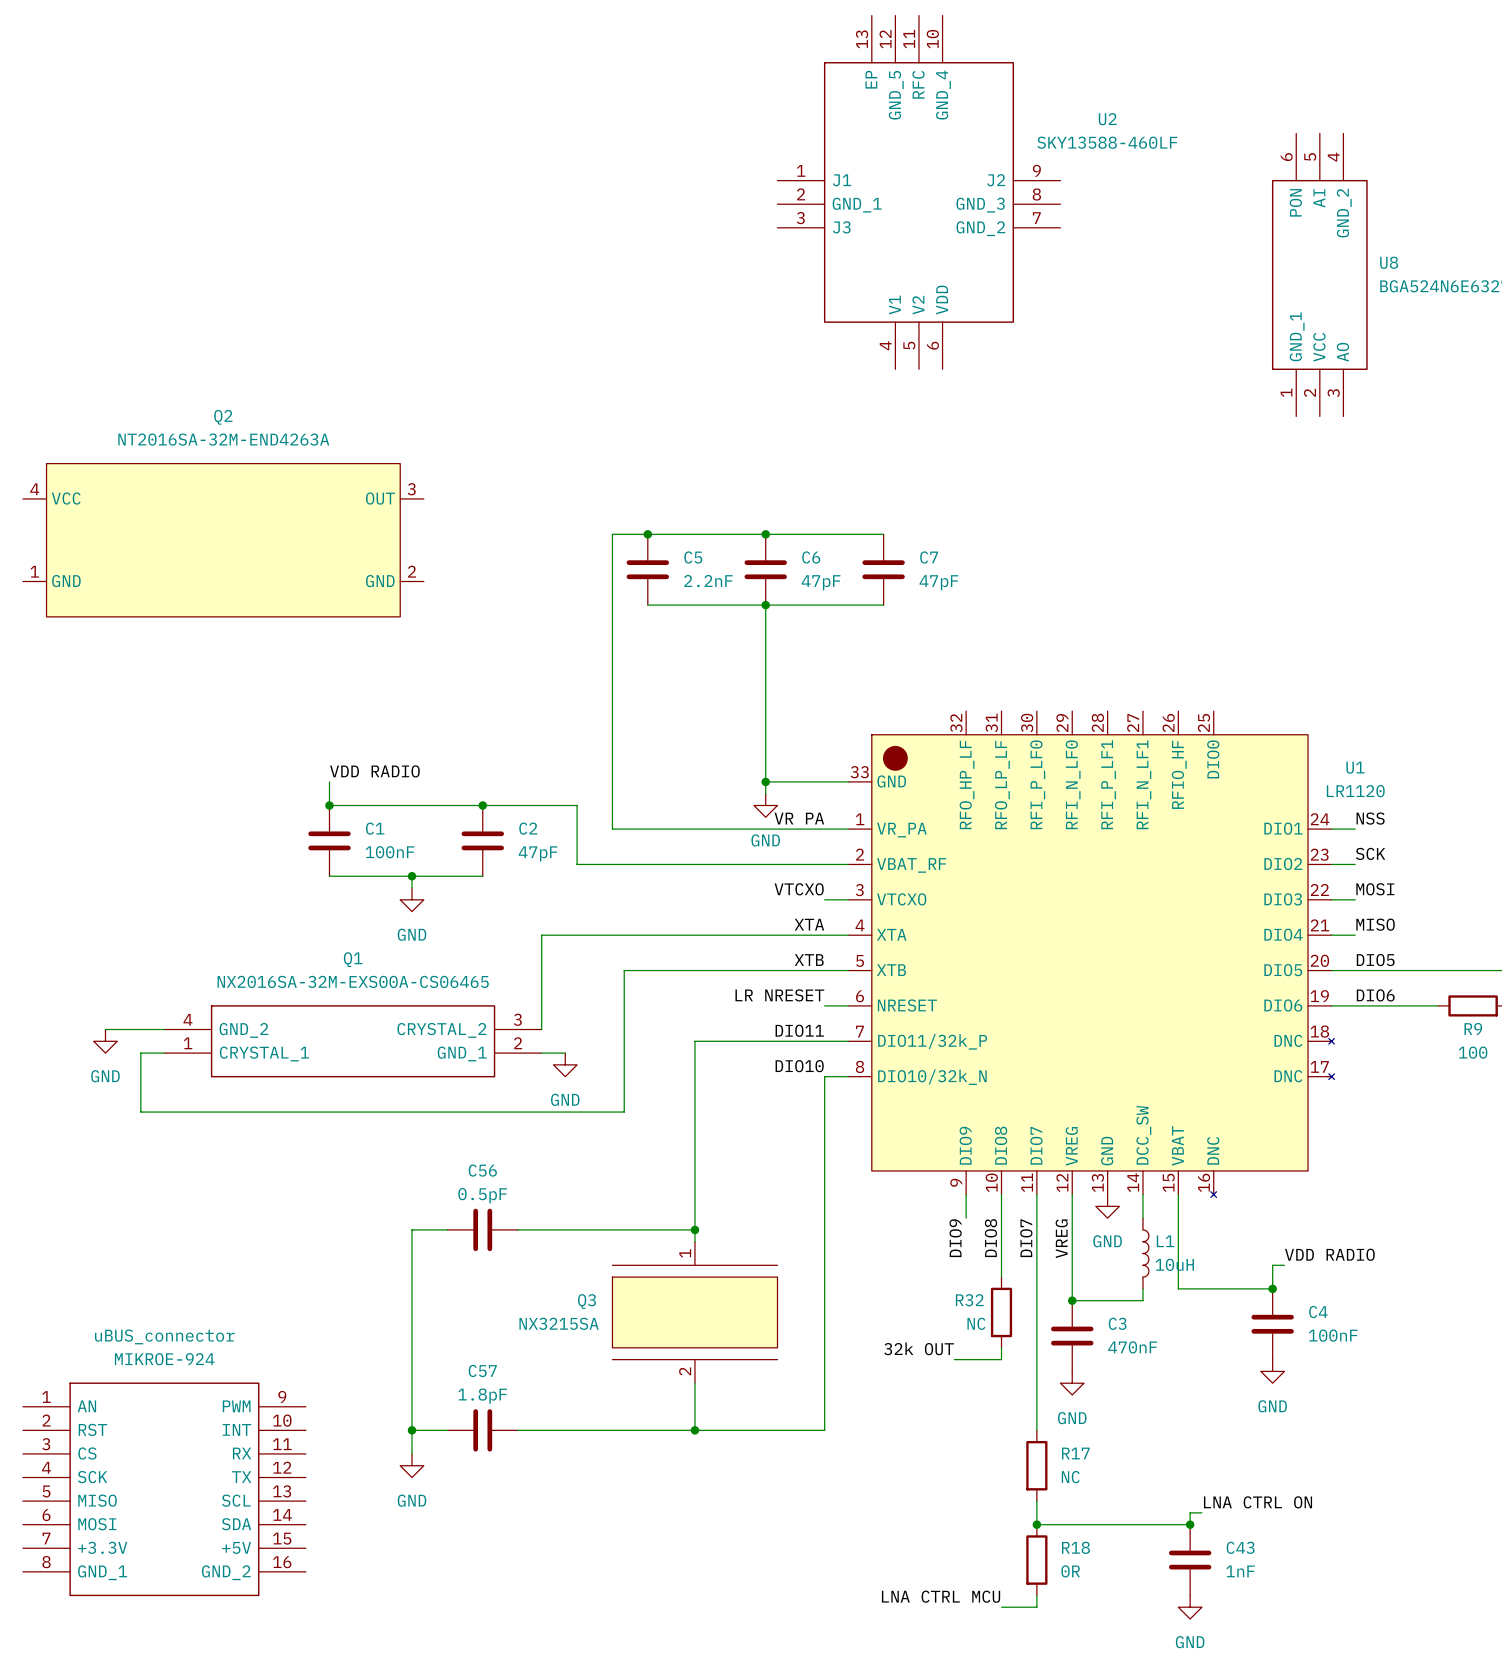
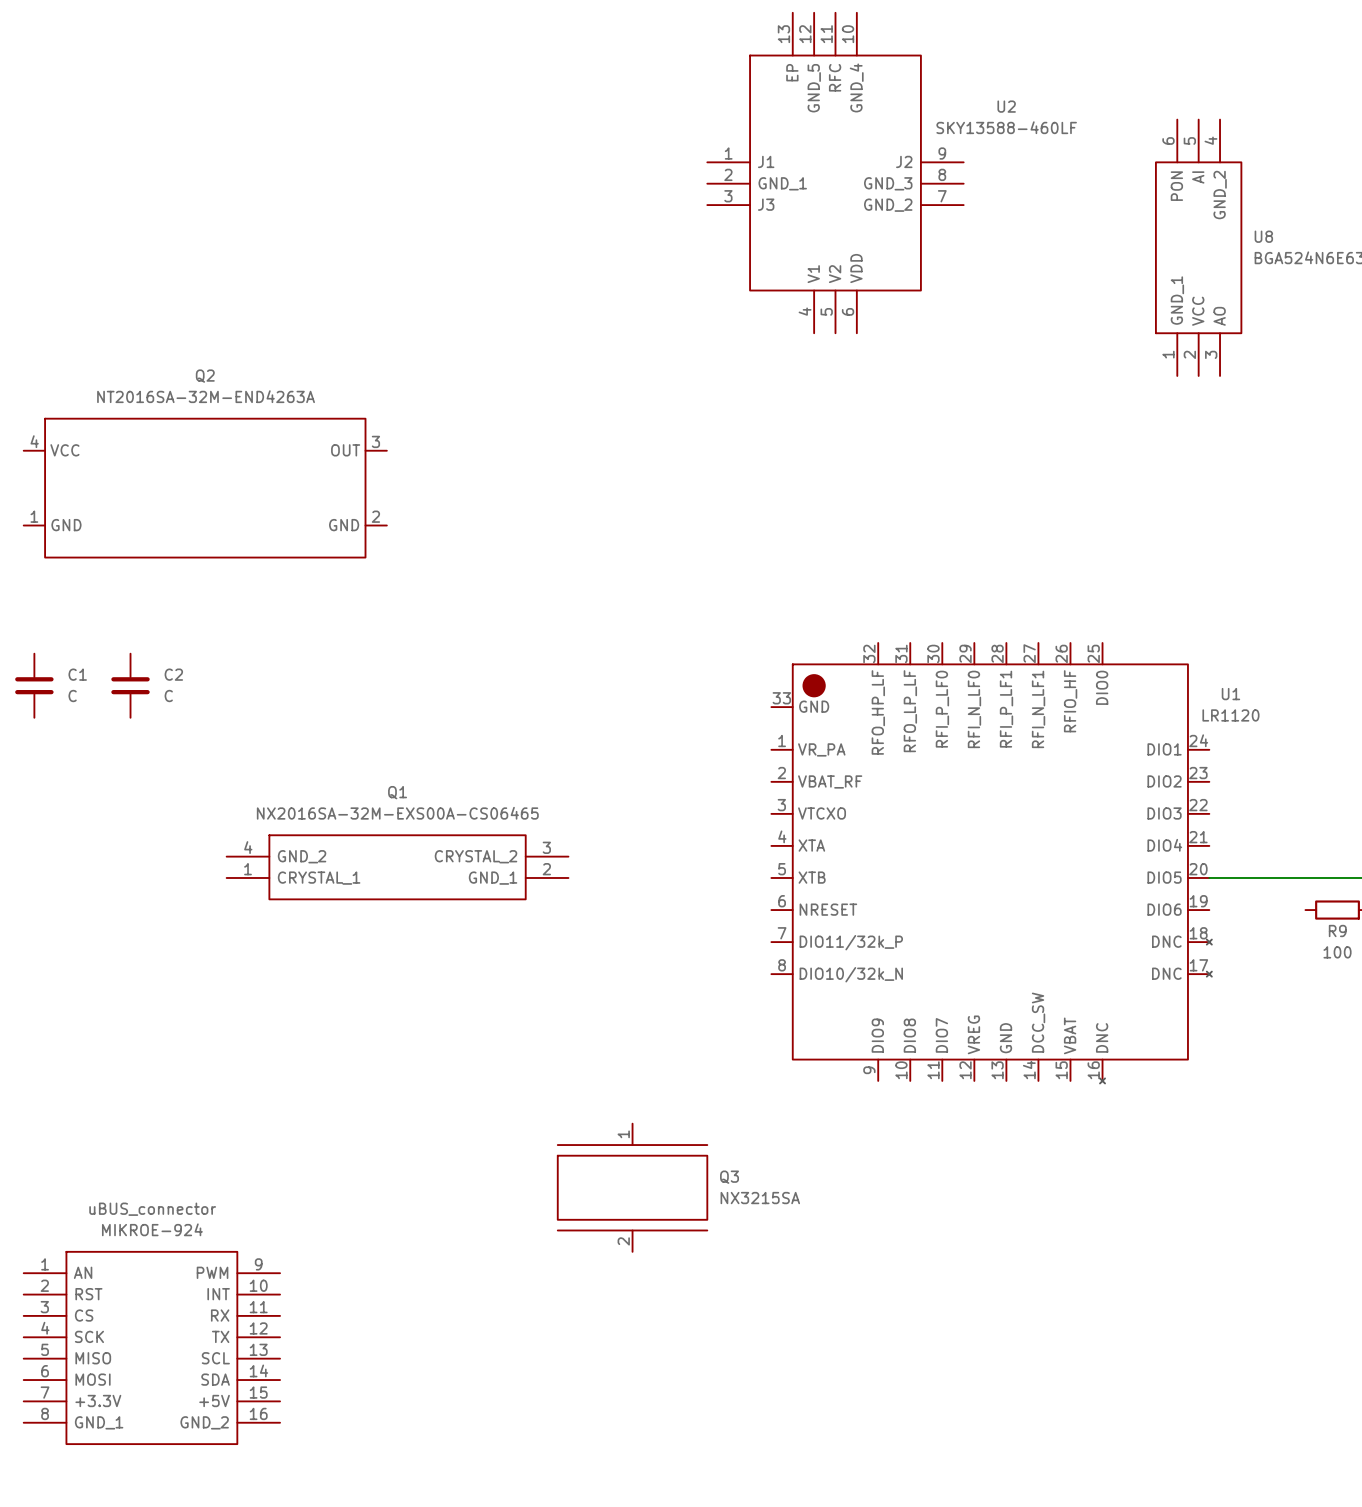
junction: (647, 534) -> none
junction: (765, 534) -> none
wire: (883, 534) (612, 534) (612, 829) (848, 829) -> none
C5: 2.2nF (647, 569) -> none
C6: 47pF (765, 569) -> none
C7: 47pF (883, 569) -> none
wire: (647, 605) (883, 605) -> none
wire: (765, 605) (765, 793) -> none
junction: (765, 605) -> none
label: VDD RADIO (374, 771) -> none
wire: (329, 781) (329, 805) (577, 805) (577, 864) (848, 864) -> none
wire: (765, 781) (848, 781) -> none
junction: (765, 781) -> none
junction: (329, 805) -> none
junction: (482, 805) -> none
power symbol: GND (765, 805) -> none
label: VR PA (799, 818) -> none
label: NSS (1370, 818) -> none
wire: (1331, 829) (1355, 829) -> none
C1 position: (329, 840) -> (34, 685)
C2 position: (482, 840) -> (130, 685)
C1 value: 100nF (390, 852) -> C (72, 696)
C2 value: 47pF (538, 853) -> C (168, 696)
label: SCK (1370, 853) -> none
wire: (1331, 864) (1355, 864) -> none
wire: (329, 876) (482, 876) -> none
wire: (412, 876) (412, 888) -> none
junction: (412, 876) -> none
label: VTCXO (799, 889) -> none
label: MOSI (1375, 889) -> none
power symbol: GND (412, 899) -> none
wire: (824, 899) (848, 899) -> none
wire: (1331, 899) (1355, 899) -> none
label: XTA (809, 924) -> none
label: MISO (1375, 924) -> none
wire: (848, 935) (541, 935) (541, 1029) -> none
wire: (1331, 935) (1355, 935) -> none
label: XTB (809, 960) -> none
label: DIO5 (1375, 960) -> none
wire: (848, 970) (624, 970) (624, 1112) (140, 1112) (140, 1053) (164, 1053) -> none
label: LR NRESET (779, 995) -> none
label: DIO6 (1375, 995) -> none
wire: (824, 1005) (848, 1005) -> none
wire: (1331, 1005) (1437, 1005) -> none
wire: (105, 1029) (164, 1029) -> none
label: DIO11 (799, 1030) -> none
power symbol: GND (105, 1041) -> none
Q1 position: (353, 1041) -> (397, 867)
wire: (848, 1041) (694, 1041) (694, 1241) -> none
wire: (541, 1053) (565, 1053) -> none
power symbol: GND (565, 1064) -> none
label: DIO10 (799, 1066) -> none
wire: (848, 1076) (824, 1076) (824, 1430) (518, 1430) -> none
wire: (966, 1194) (966, 1218) -> none
wire: (1001, 1194) (1001, 1277) -> none
wire: (1036, 1194) (1036, 1430) -> none
wire: (1072, 1194) (1072, 1300) (1142, 1300) (1142, 1288) -> none
wire: (1142, 1194) (1142, 1218) -> none
wire: (1178, 1194) (1178, 1288) (1272, 1288) (1272, 1265) (1284, 1265) -> none
power symbol: GND (1107, 1206) -> none
wire: (447, 1229) (412, 1229) (412, 1453) -> none
C56: 0.5pF (482, 1229) -> none
wire: (518, 1229) (694, 1229) -> none
junction: (694, 1229) -> none
label: DIO9 (955, 1238) -> none
label: DIO8 (990, 1238) -> none
label: DIO7 (1026, 1238) -> none
label: VREG (1061, 1238) -> none
L1: 10uH (1145, 1253) -> none
label: VDD RADIO (1329, 1254) -> none
junction: (1272, 1288) -> none
junction: (1072, 1300) -> none
Q3 name position: Q3 (586, 1301) -> Q3 (729, 1177)
R32: NC (1001, 1312) -> none
Q3 value position: NX3215SA (559, 1323) -> NX3215SA (760, 1198)
C4: 100nF (1272, 1324) -> none
C3: 470nF (1072, 1336) -> none
wire: (1001, 1347) (1001, 1359) (954, 1359) -> none
label: 32k OUT (919, 1348) -> none
power symbol: GND (1272, 1371) -> none
wire: (694, 1383) (694, 1430) -> none
power symbol: GND (1072, 1383) -> none
wire: (412, 1430) (447, 1430) -> none
junction: (412, 1430) -> none
C57: 1.8pF (482, 1430) -> none
junction: (694, 1430) -> none
power symbol: GND (412, 1465) -> none
R17: NC (1036, 1465) -> none
wire: (1036, 1501) (1036, 1524) (1190, 1524) (1190, 1512) (1201, 1512) -> none
label: LNA CTRL ON (1258, 1502) -> none
junction: (1036, 1524) -> none
junction: (1190, 1524) -> none
R18: 0R (1036, 1560) -> none
C43: 1nF (1190, 1560) -> none
wire: (1036, 1595) (1036, 1607) (1001, 1607) -> none
label: LNA CTRL MCU (941, 1596) -> none
power symbol: GND (1190, 1607) -> none

